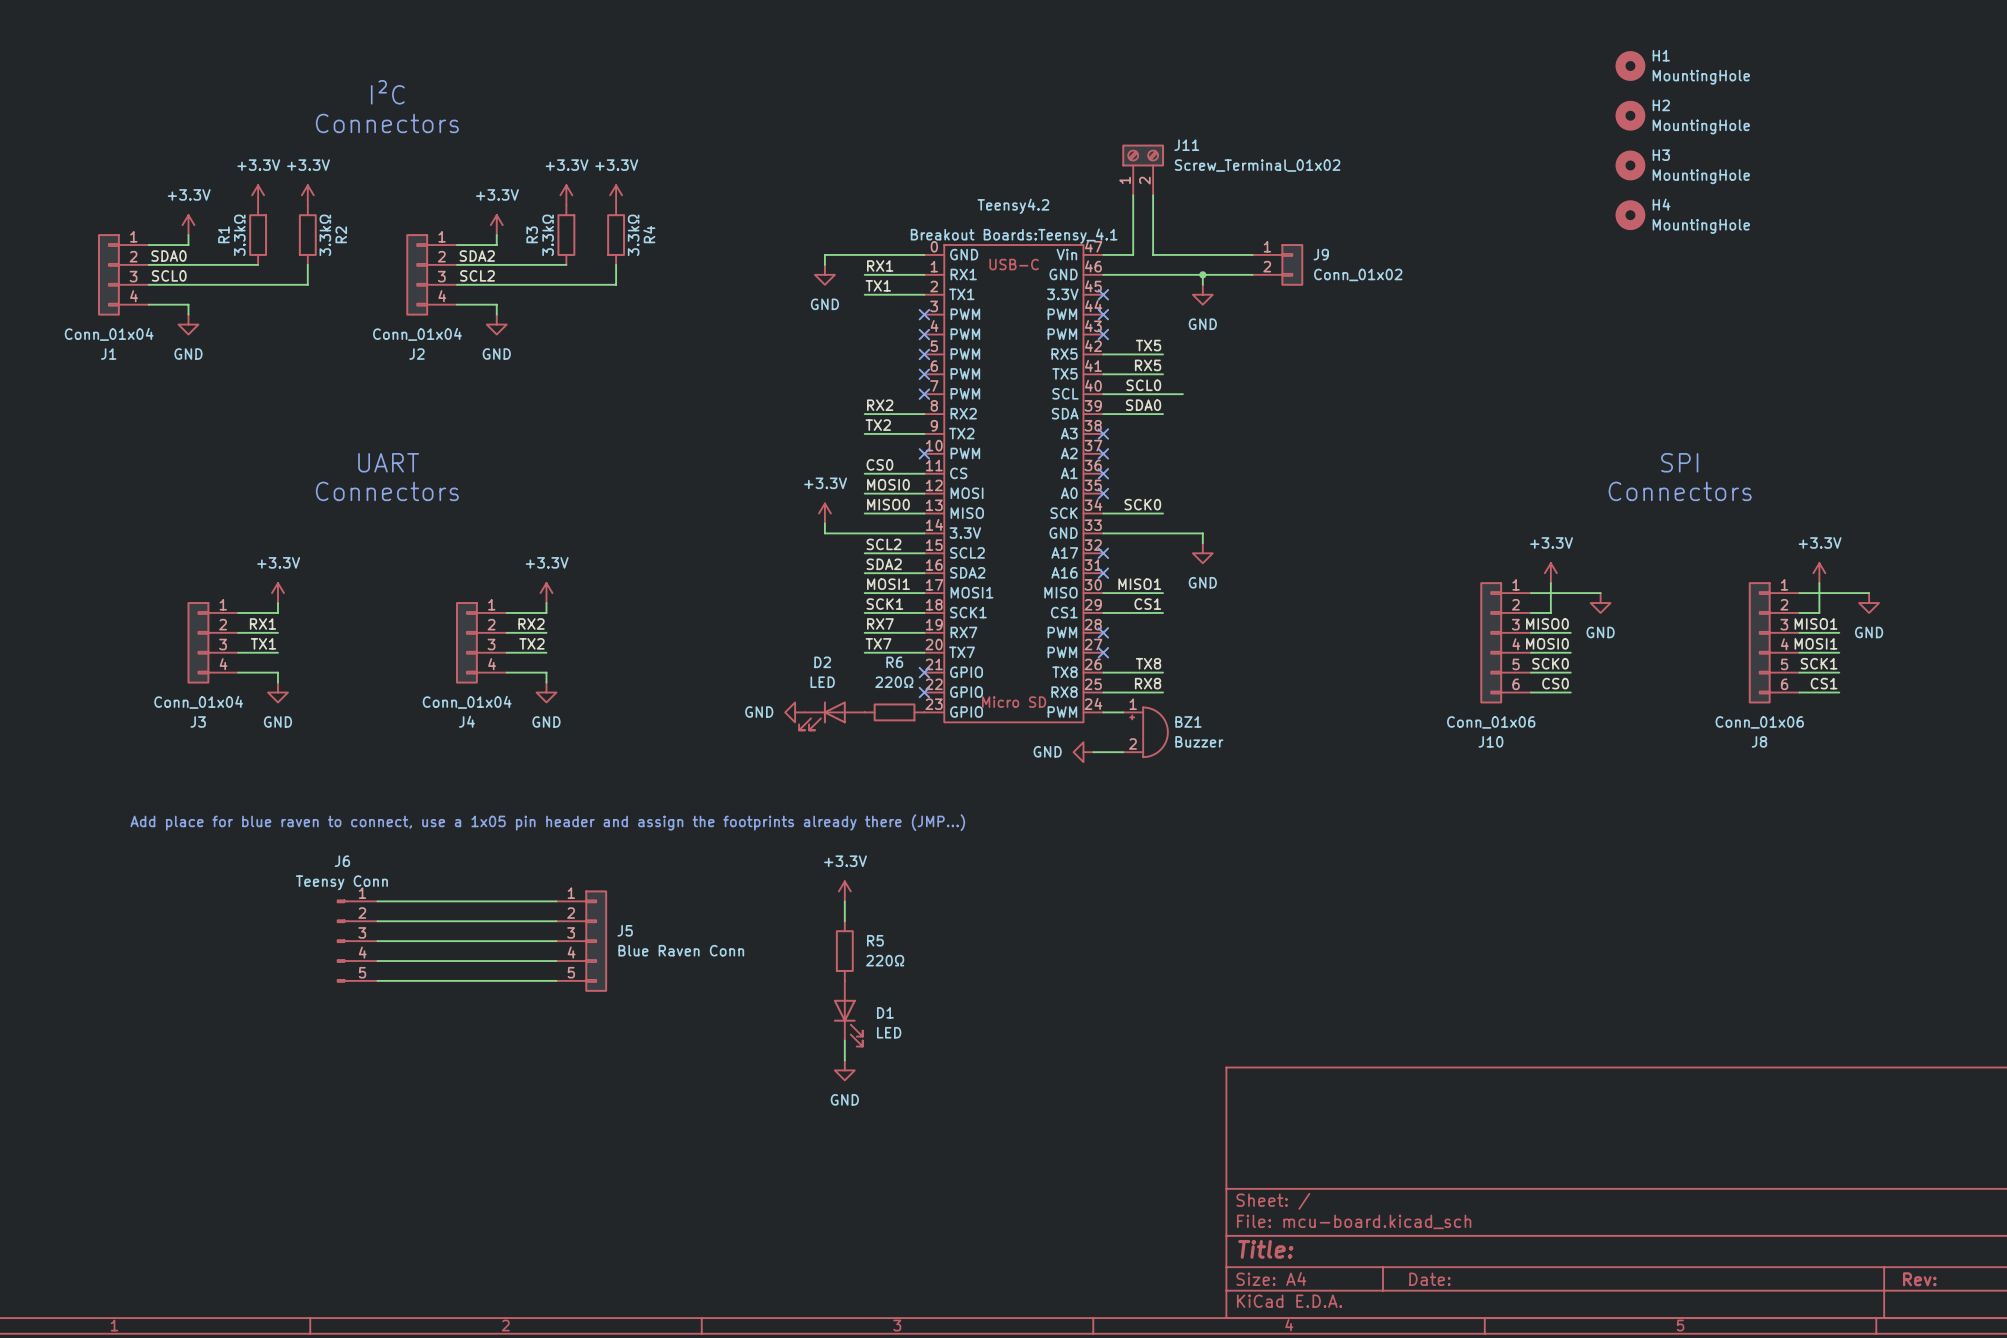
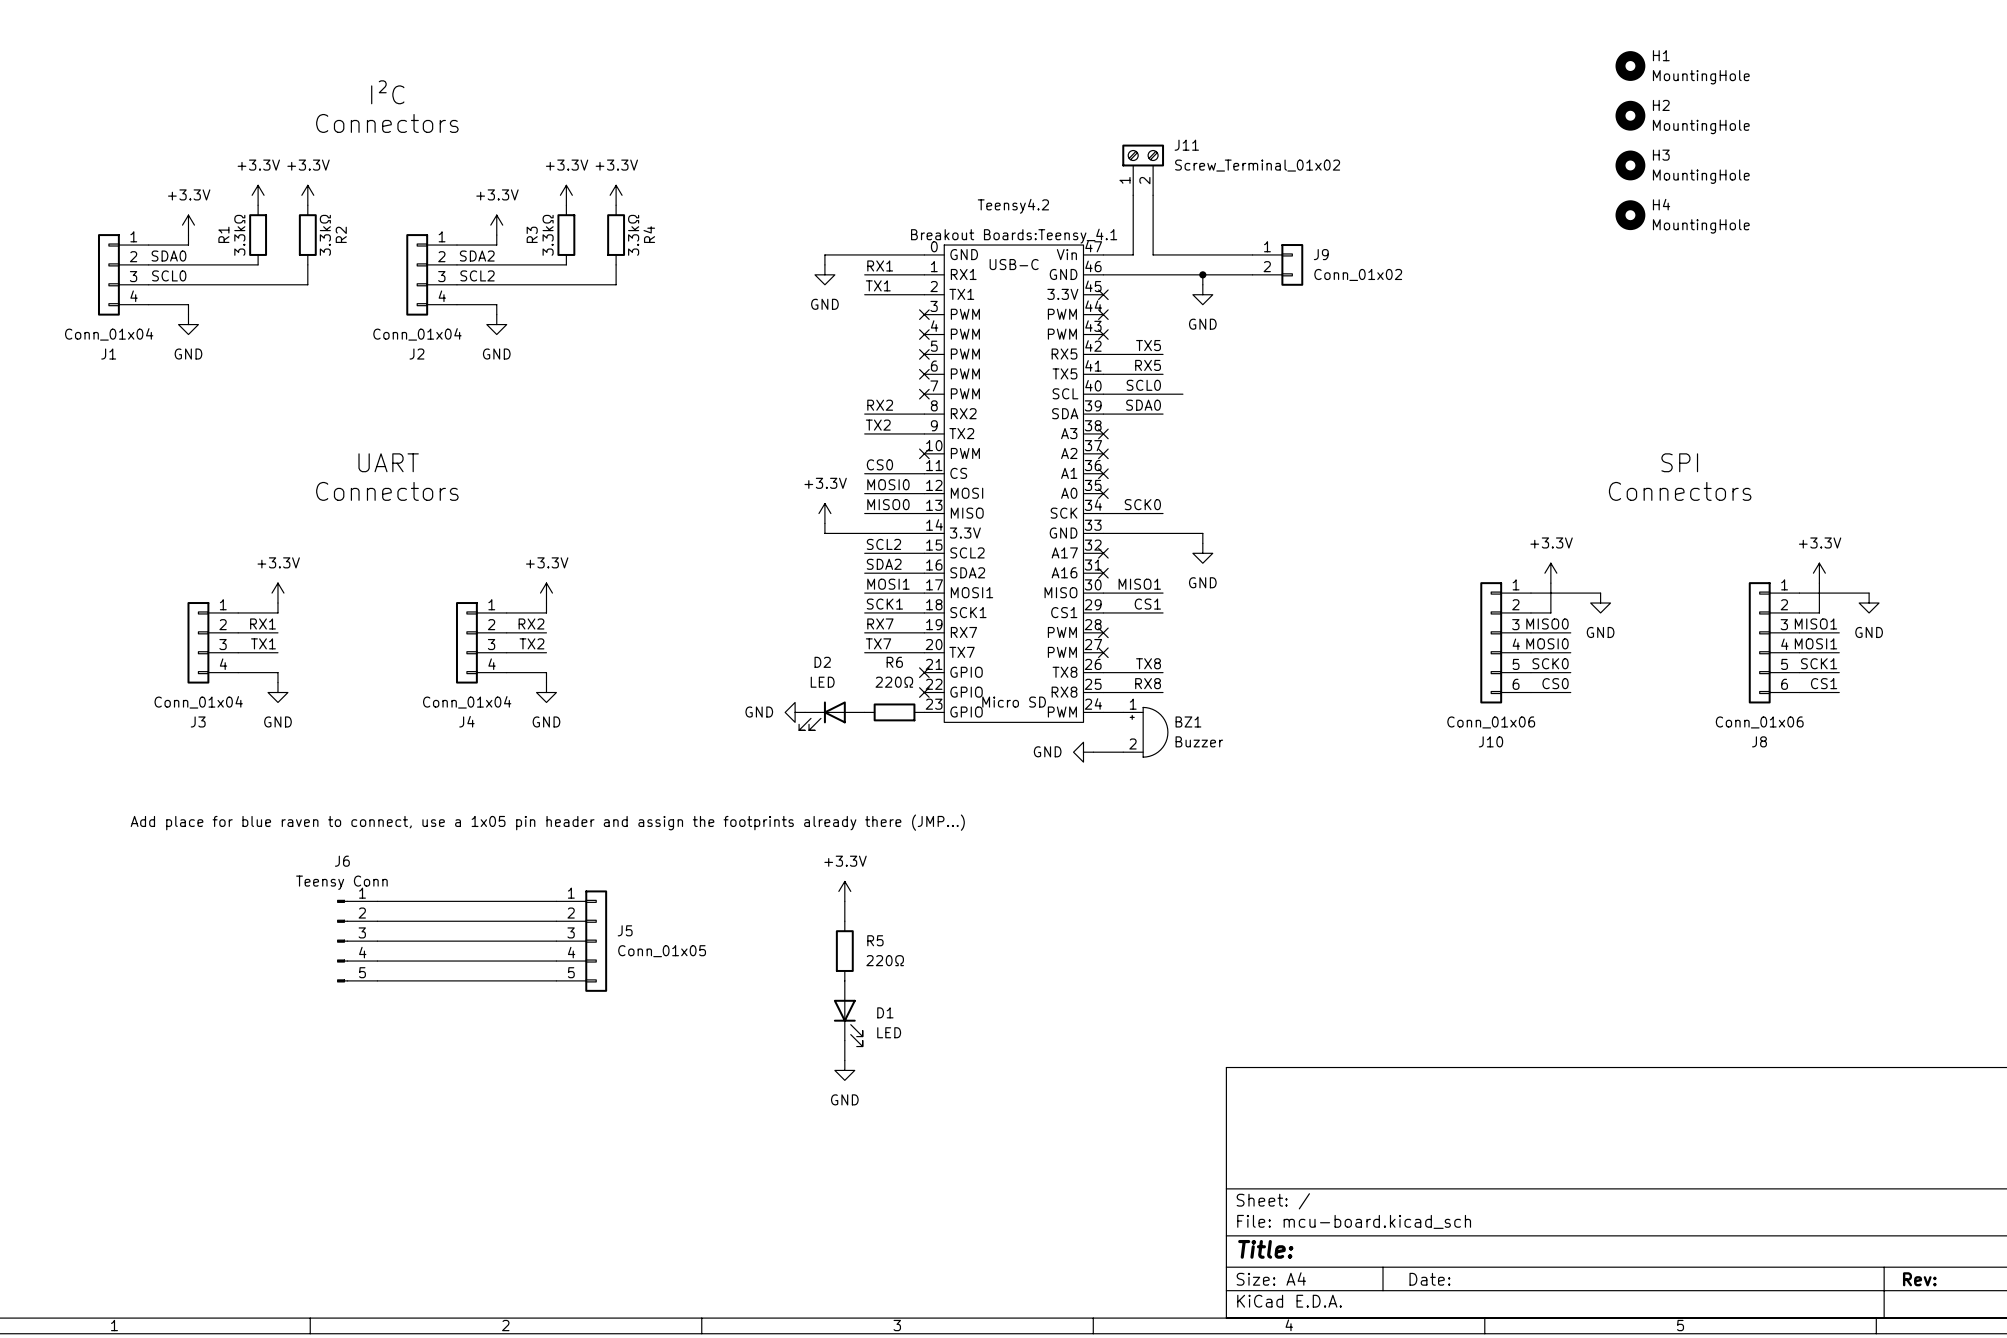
J5 value: Blue Raven Conn (681, 950) -> Conn_01x05 (662, 951)

